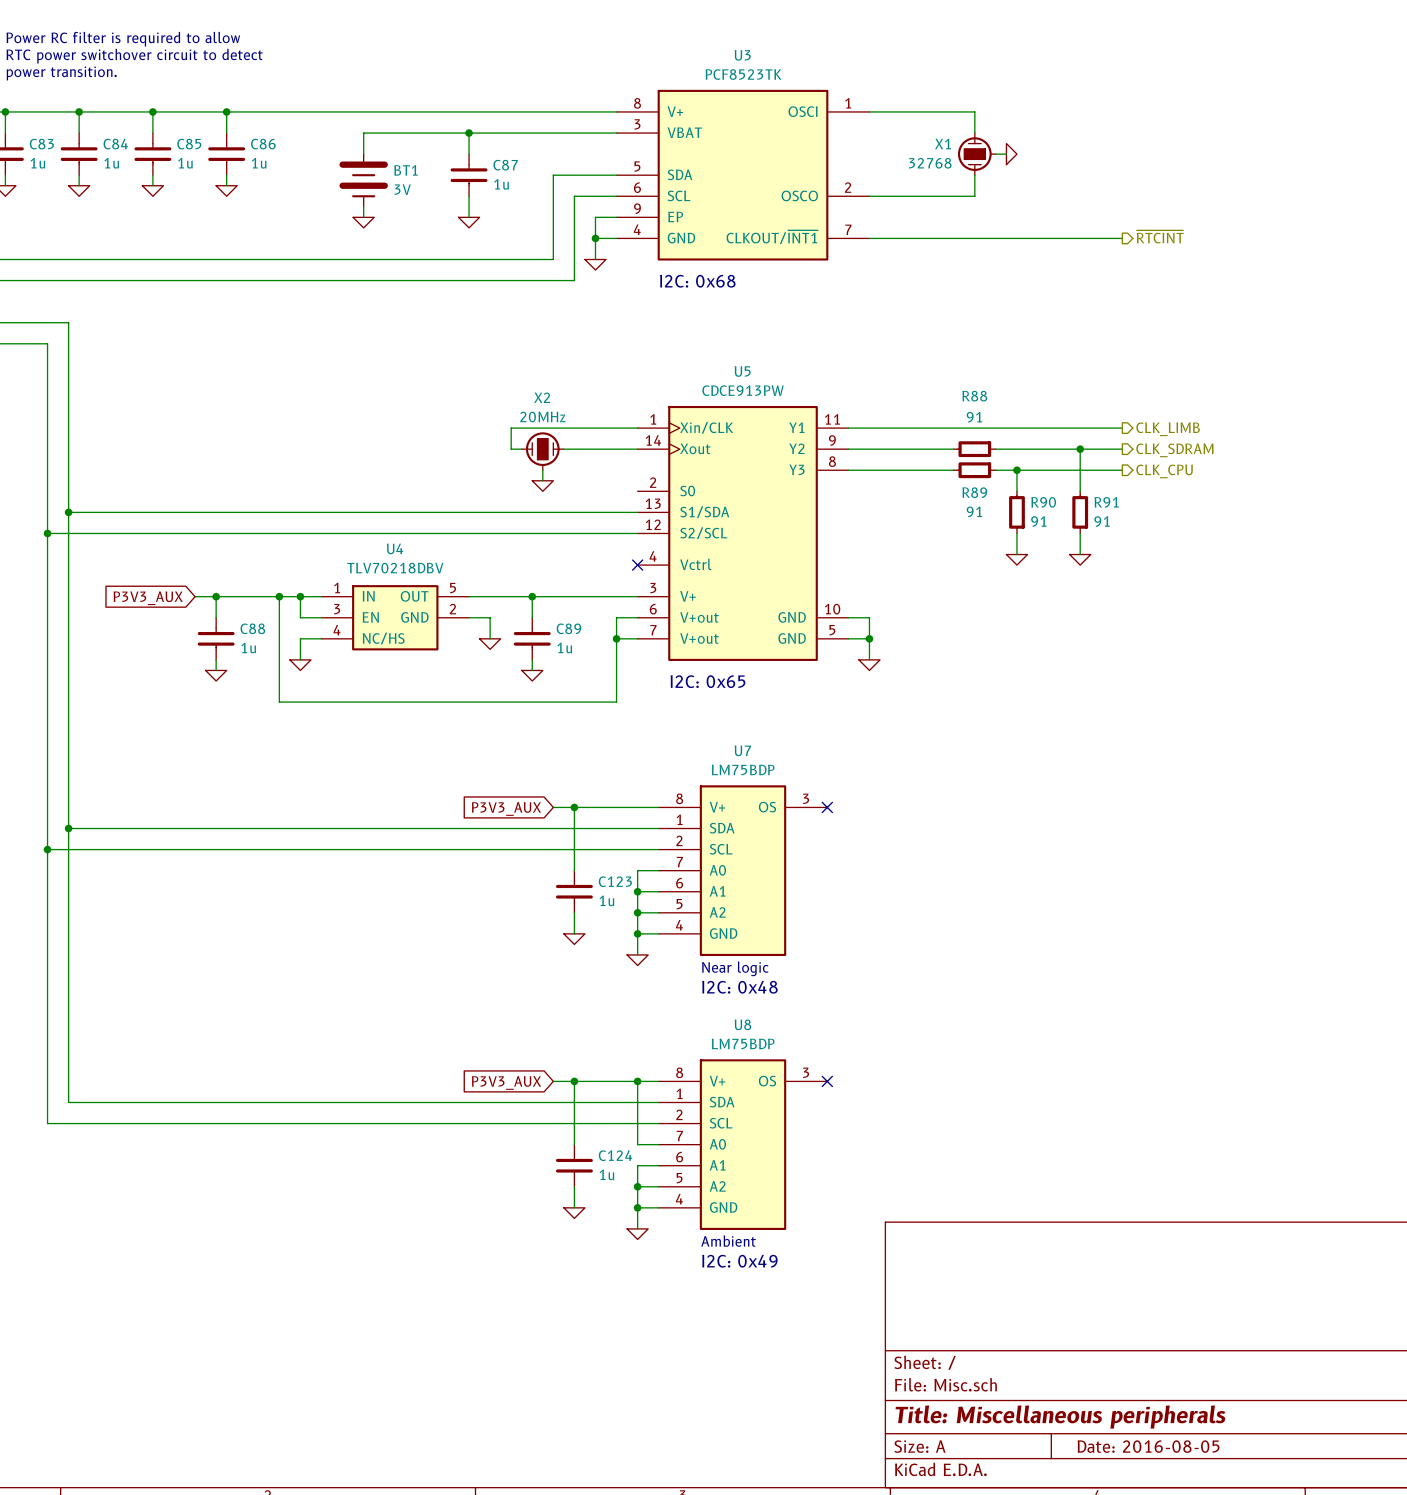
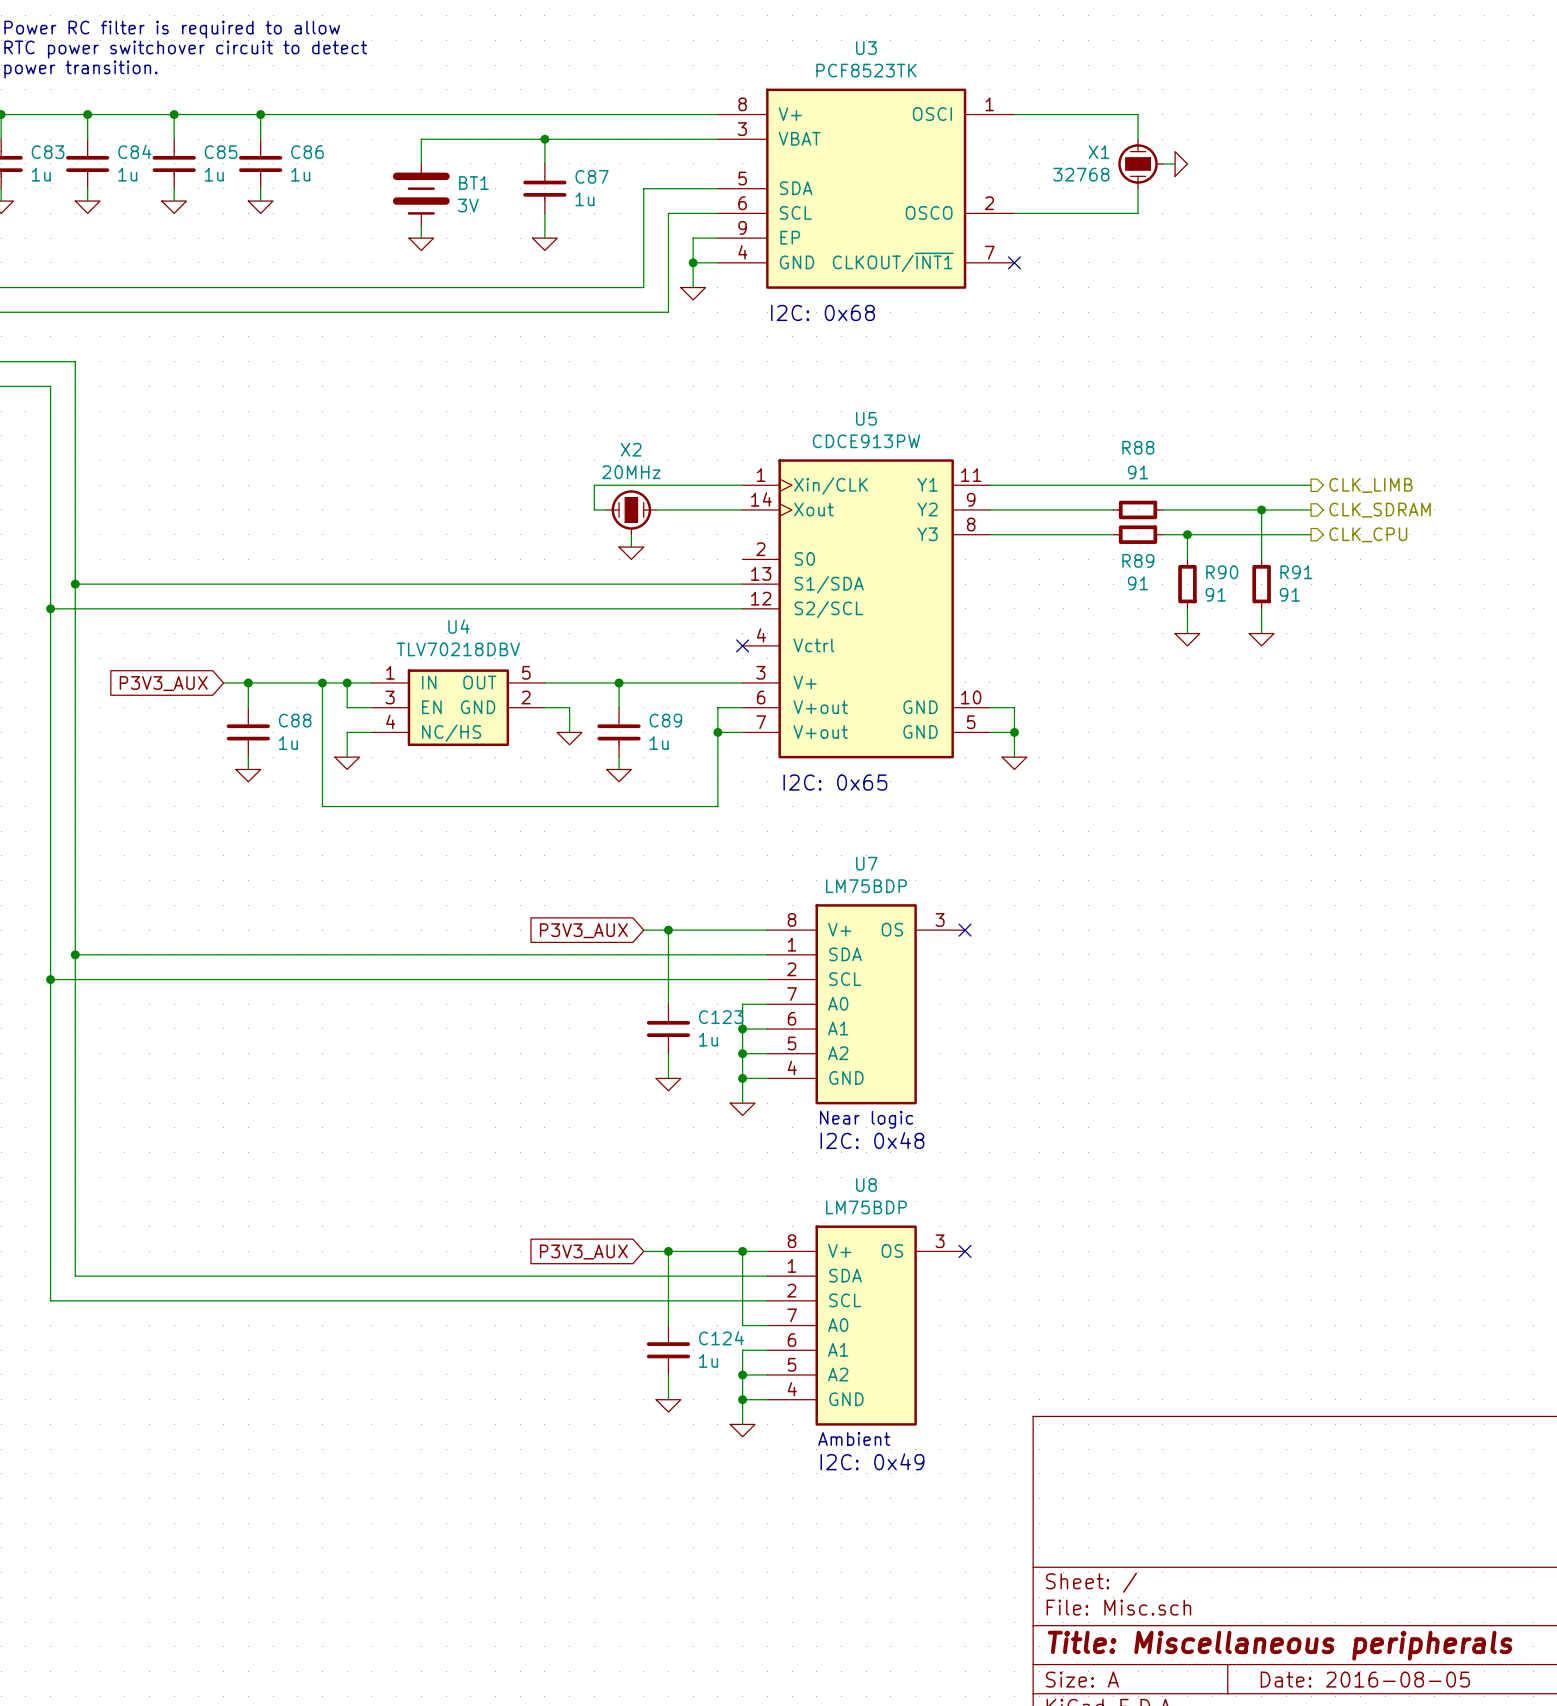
hierarchical label: ~{RTCINT} (1160, 236) -> none
wire: (869, 238) (1122, 238) -> none
no-connect mark: none -> (1014, 262)

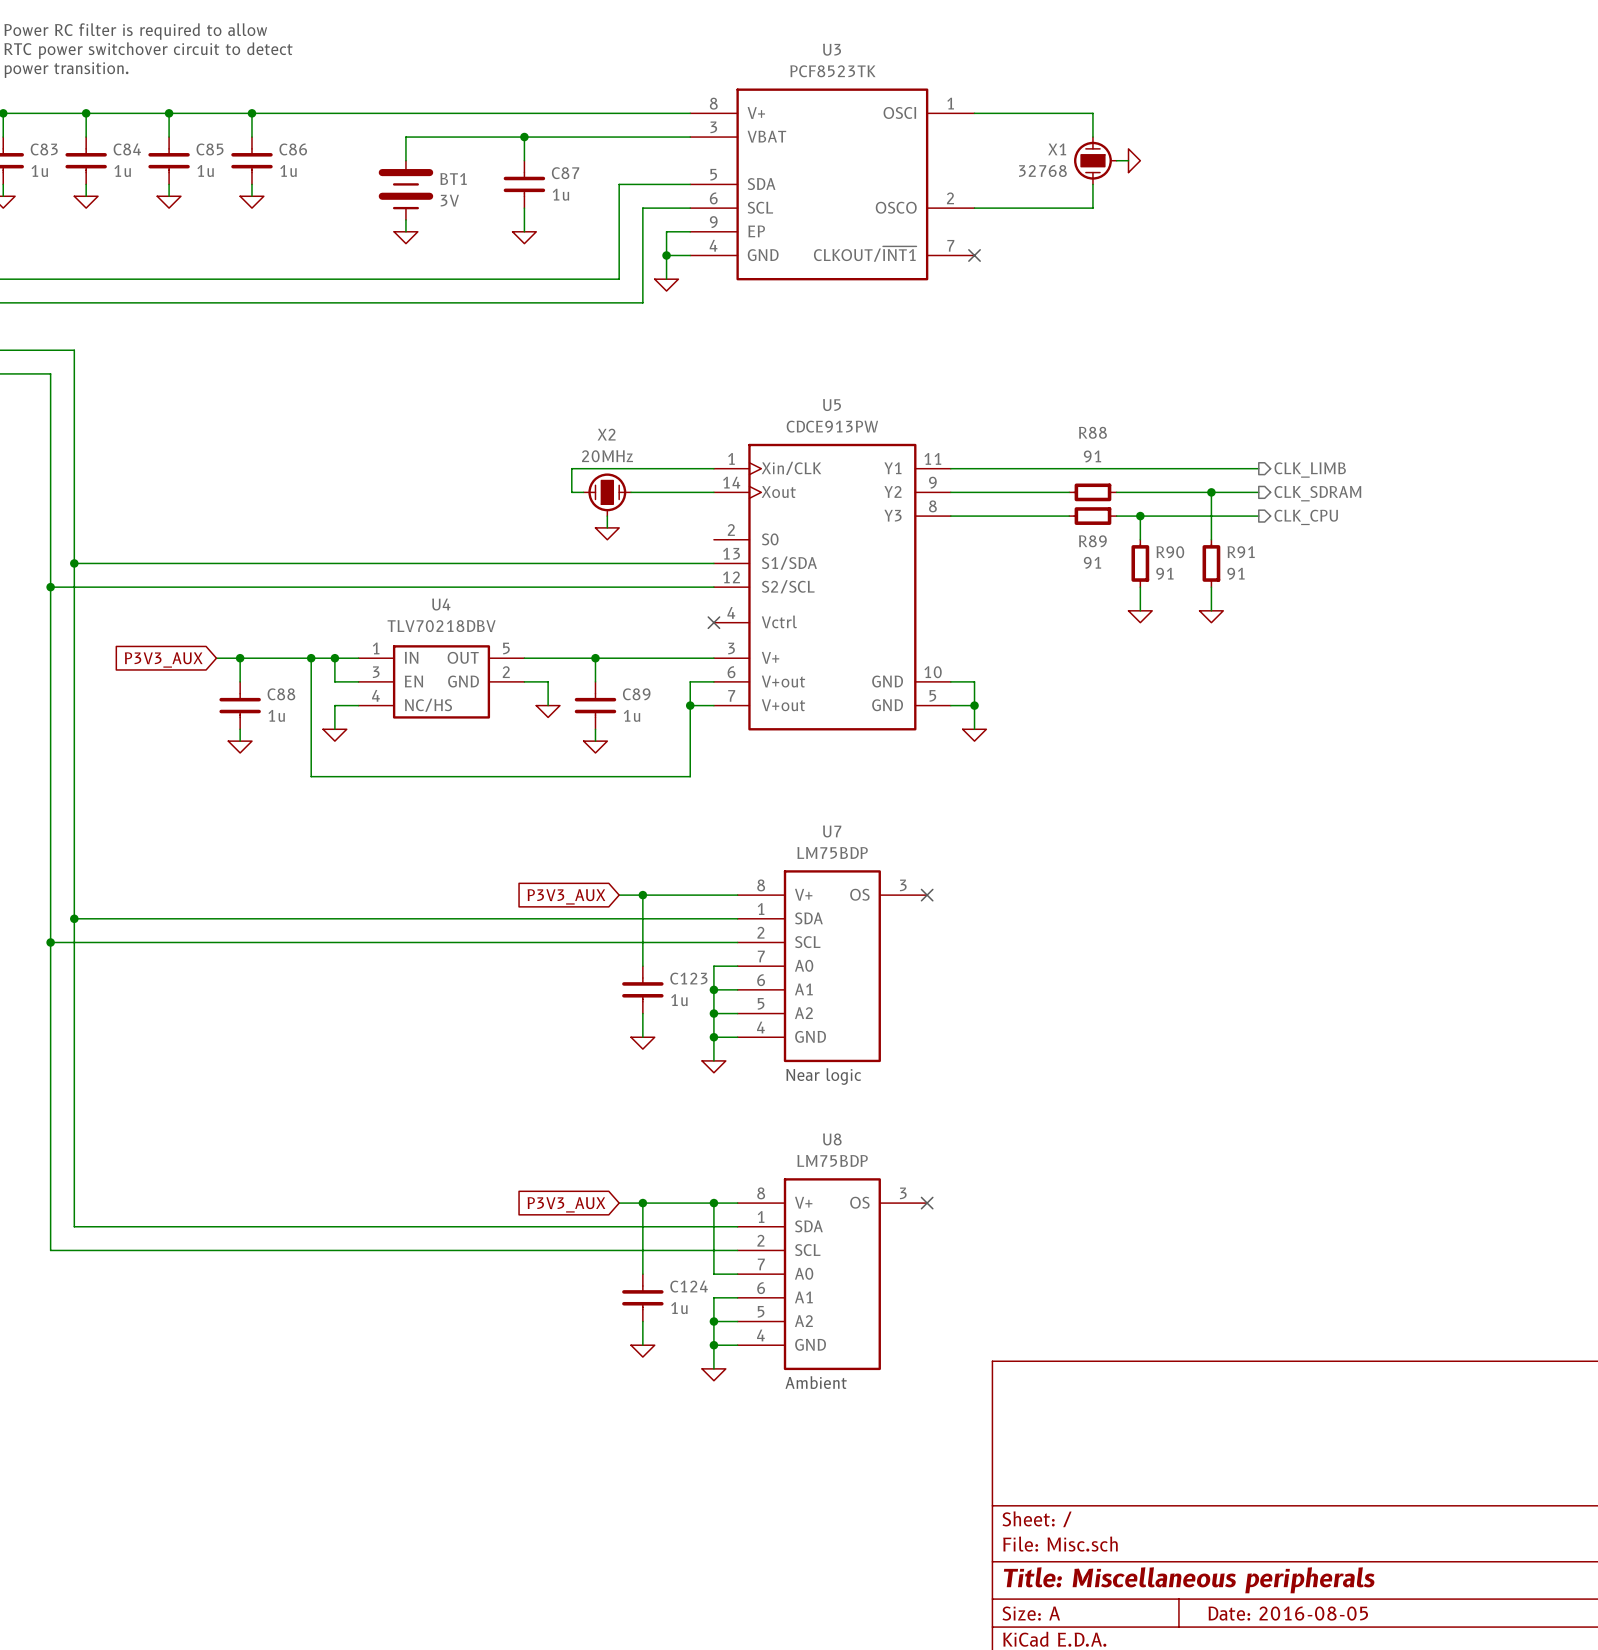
text: I2C: 0x68 (823, 312) -> none
text: I2C: 0x65 (835, 782) -> none
text: I2C: 0x48 (872, 1140) -> none
text: I2C: 0x49 (872, 1461) -> none

